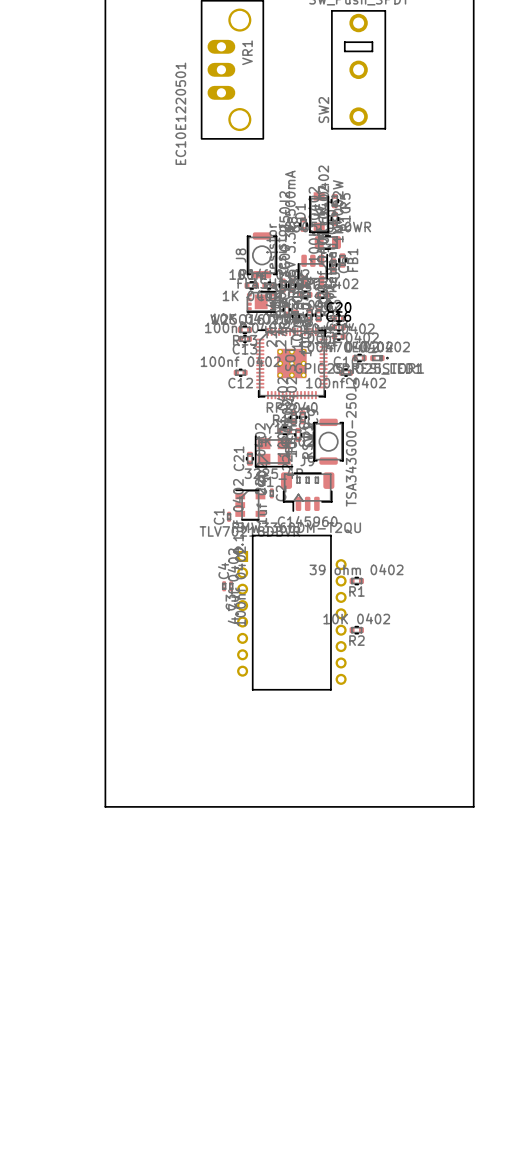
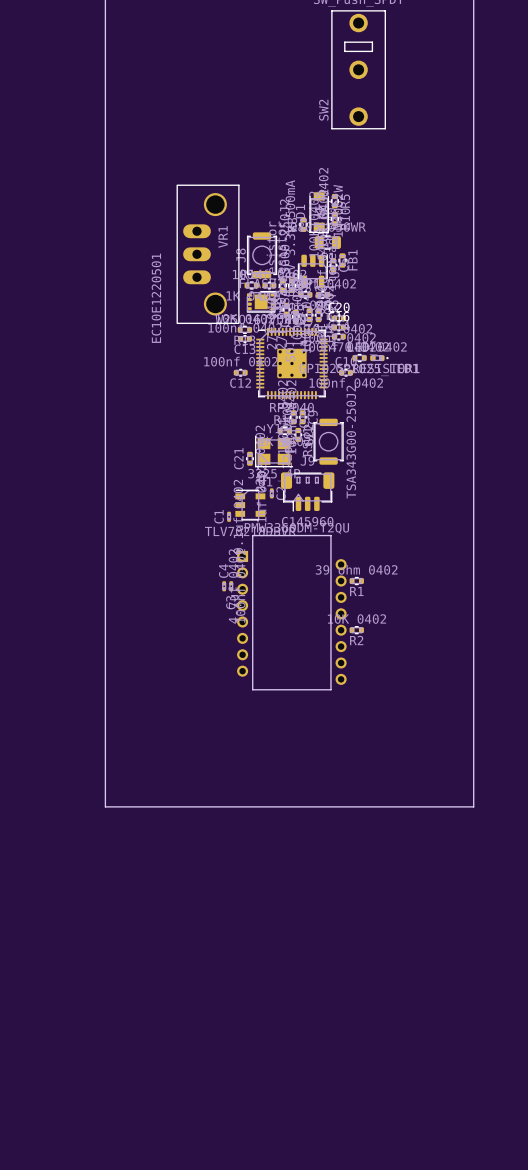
VR1 position: (232, 69) -> (208, 254)

